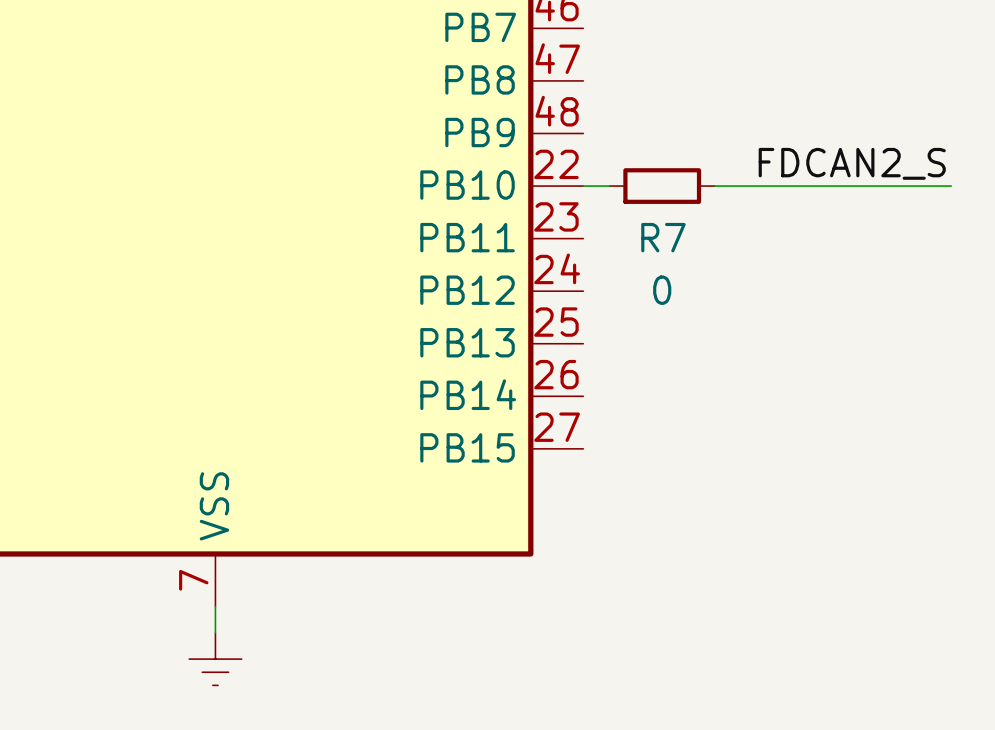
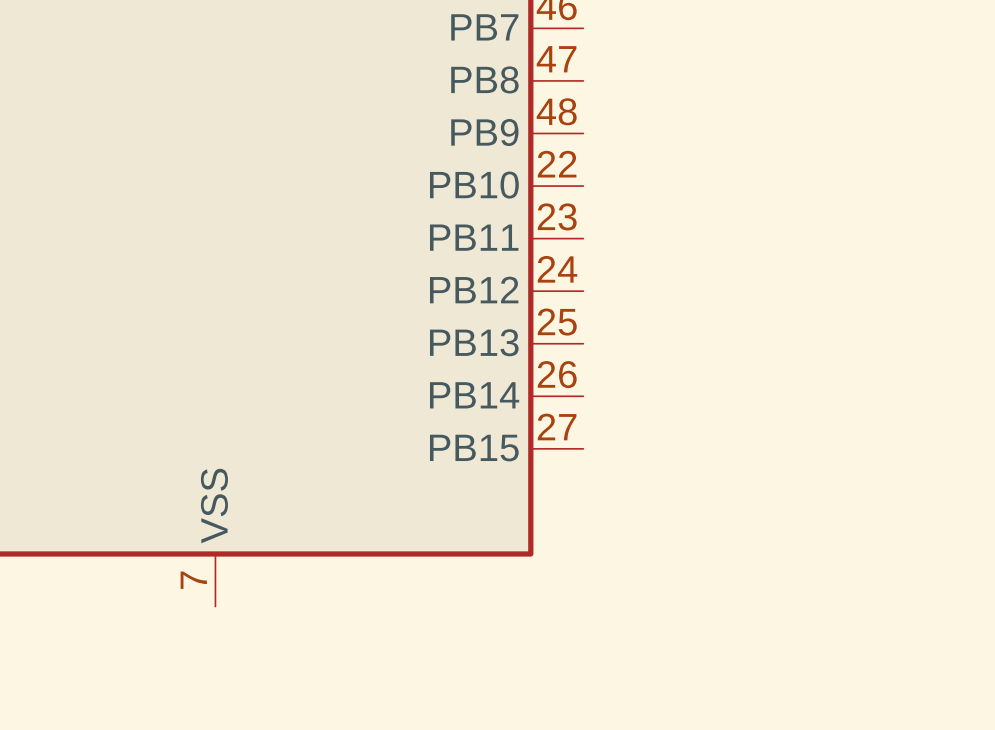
label: FDCAN2_S (852, 163) -> none
wire: (583, 186) (609, 186) -> none
R7: 0 (662, 186) -> none
wire: (714, 186) (951, 186) -> none
wire: (215, 606) (215, 632) -> none
power symbol: (215, 659) -> none

